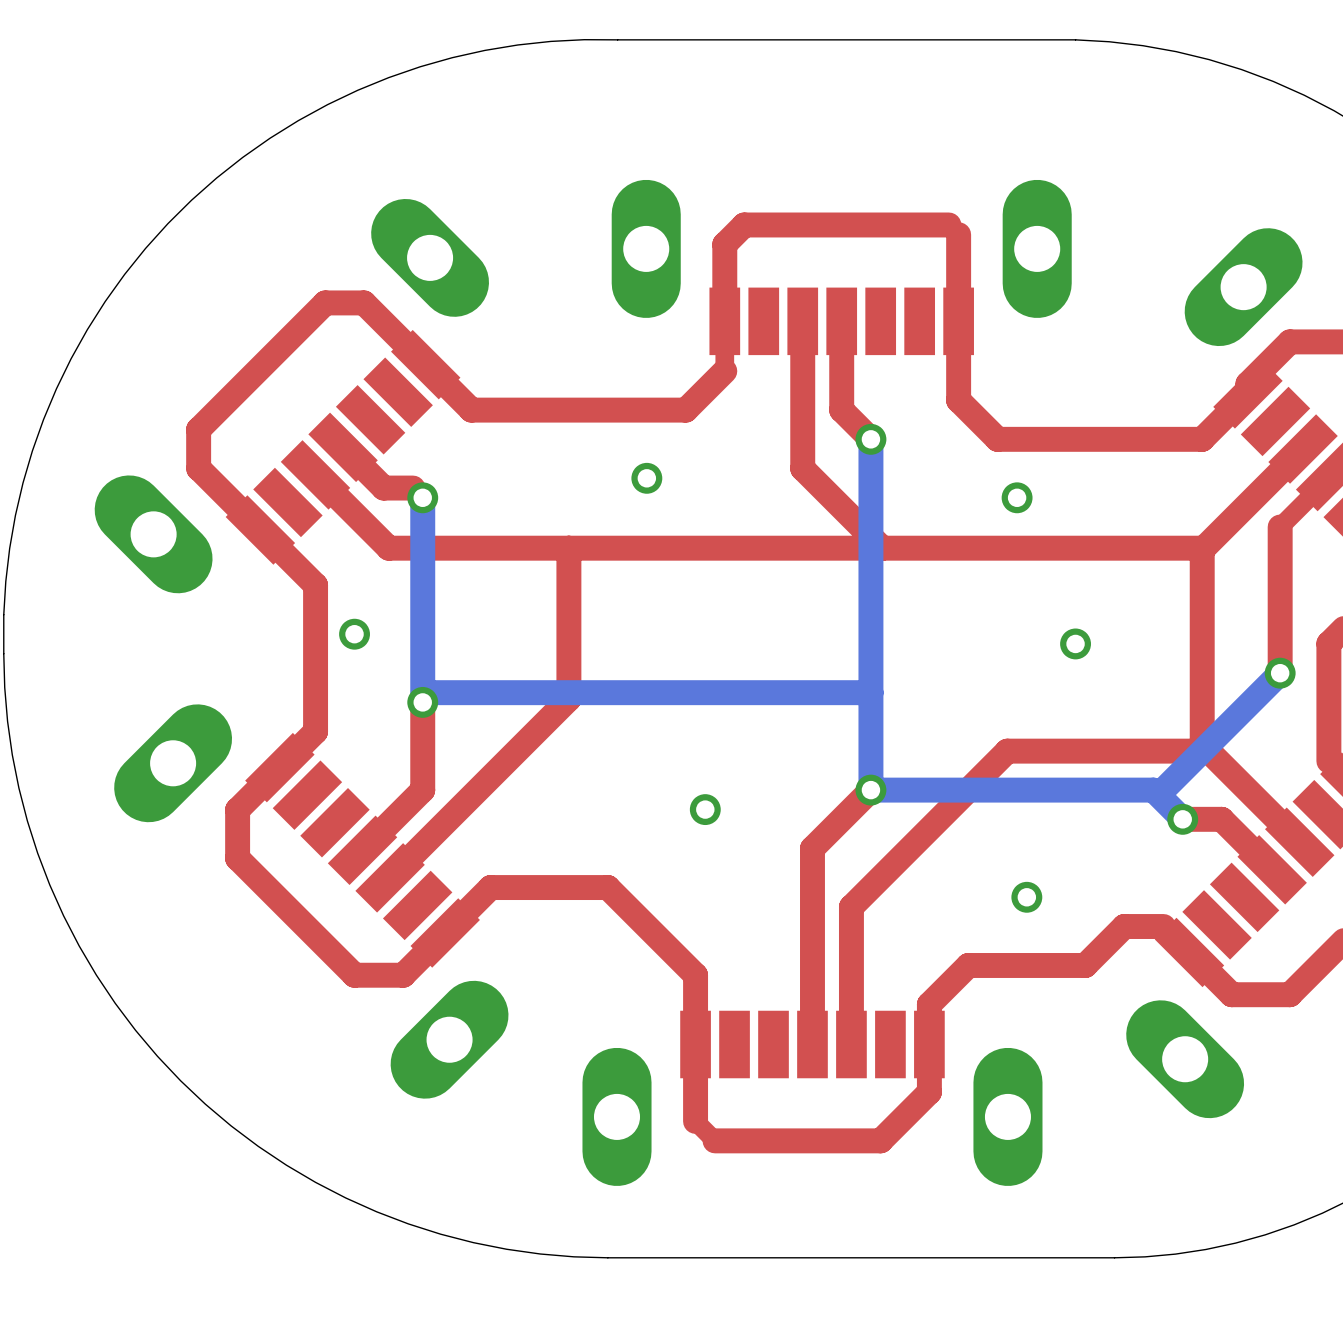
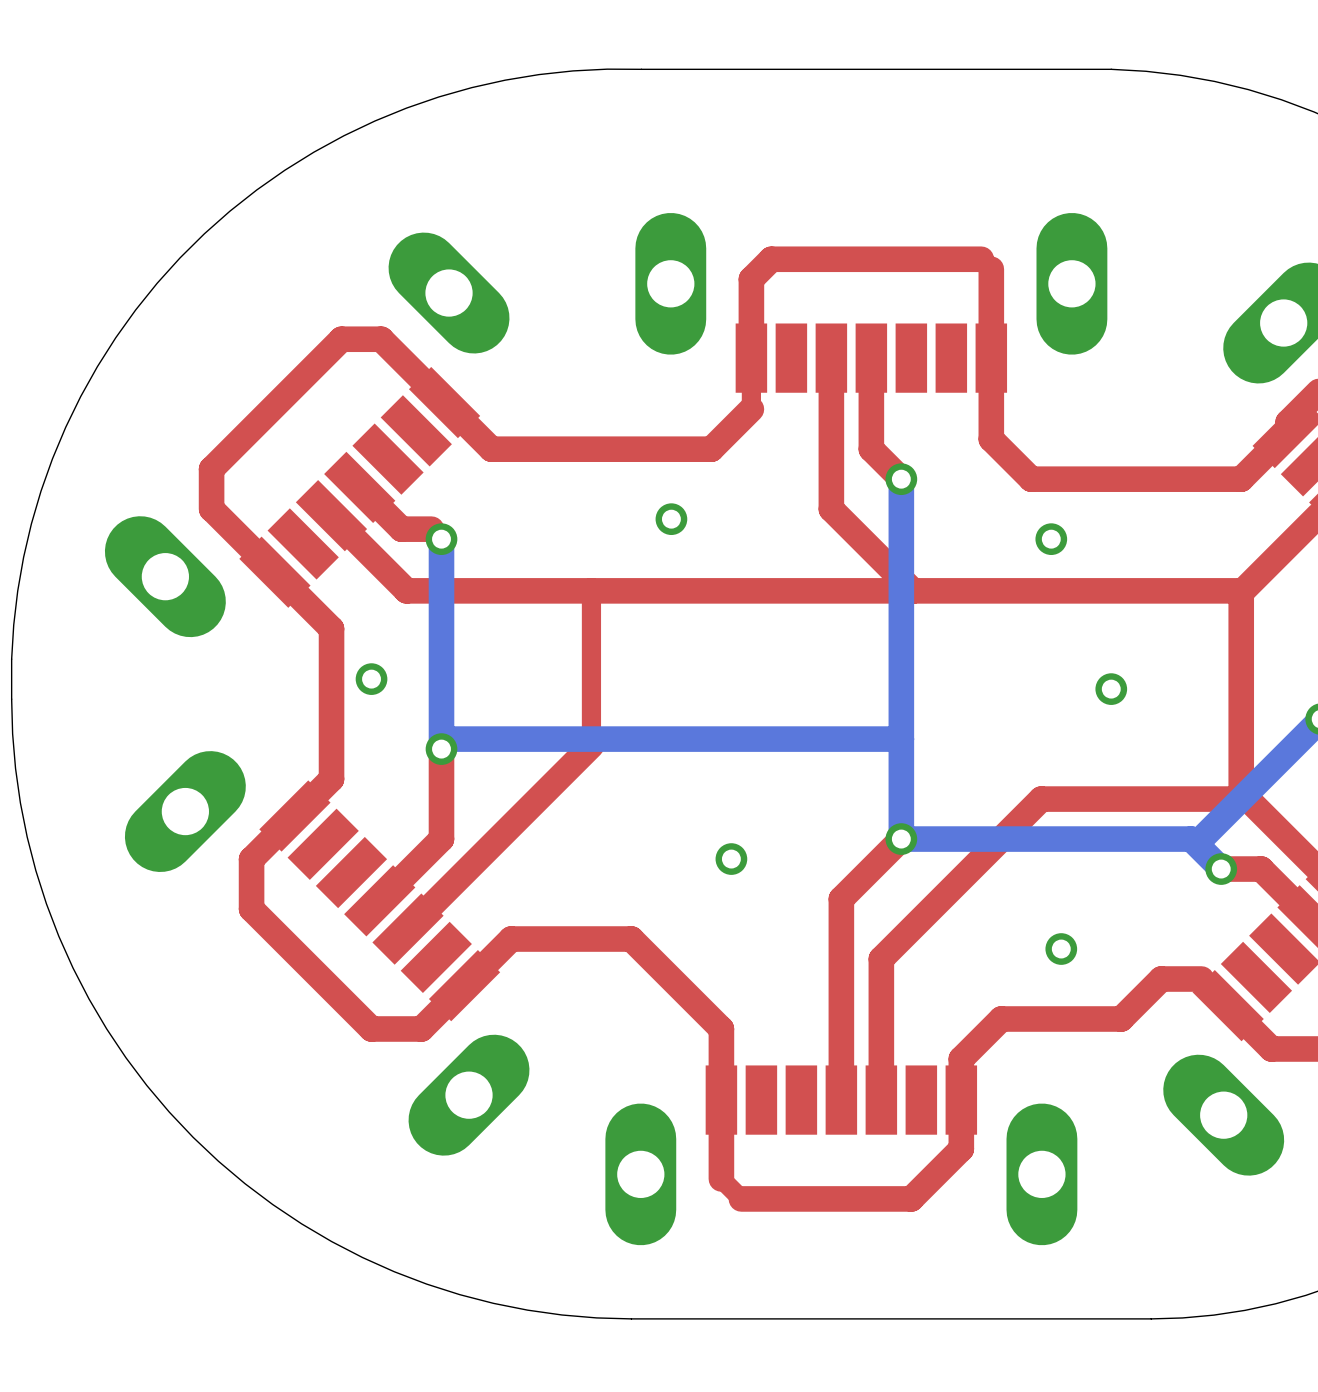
top track width: thick (568, 548) (568, 699) -> thin (591, 590) (591, 745)

